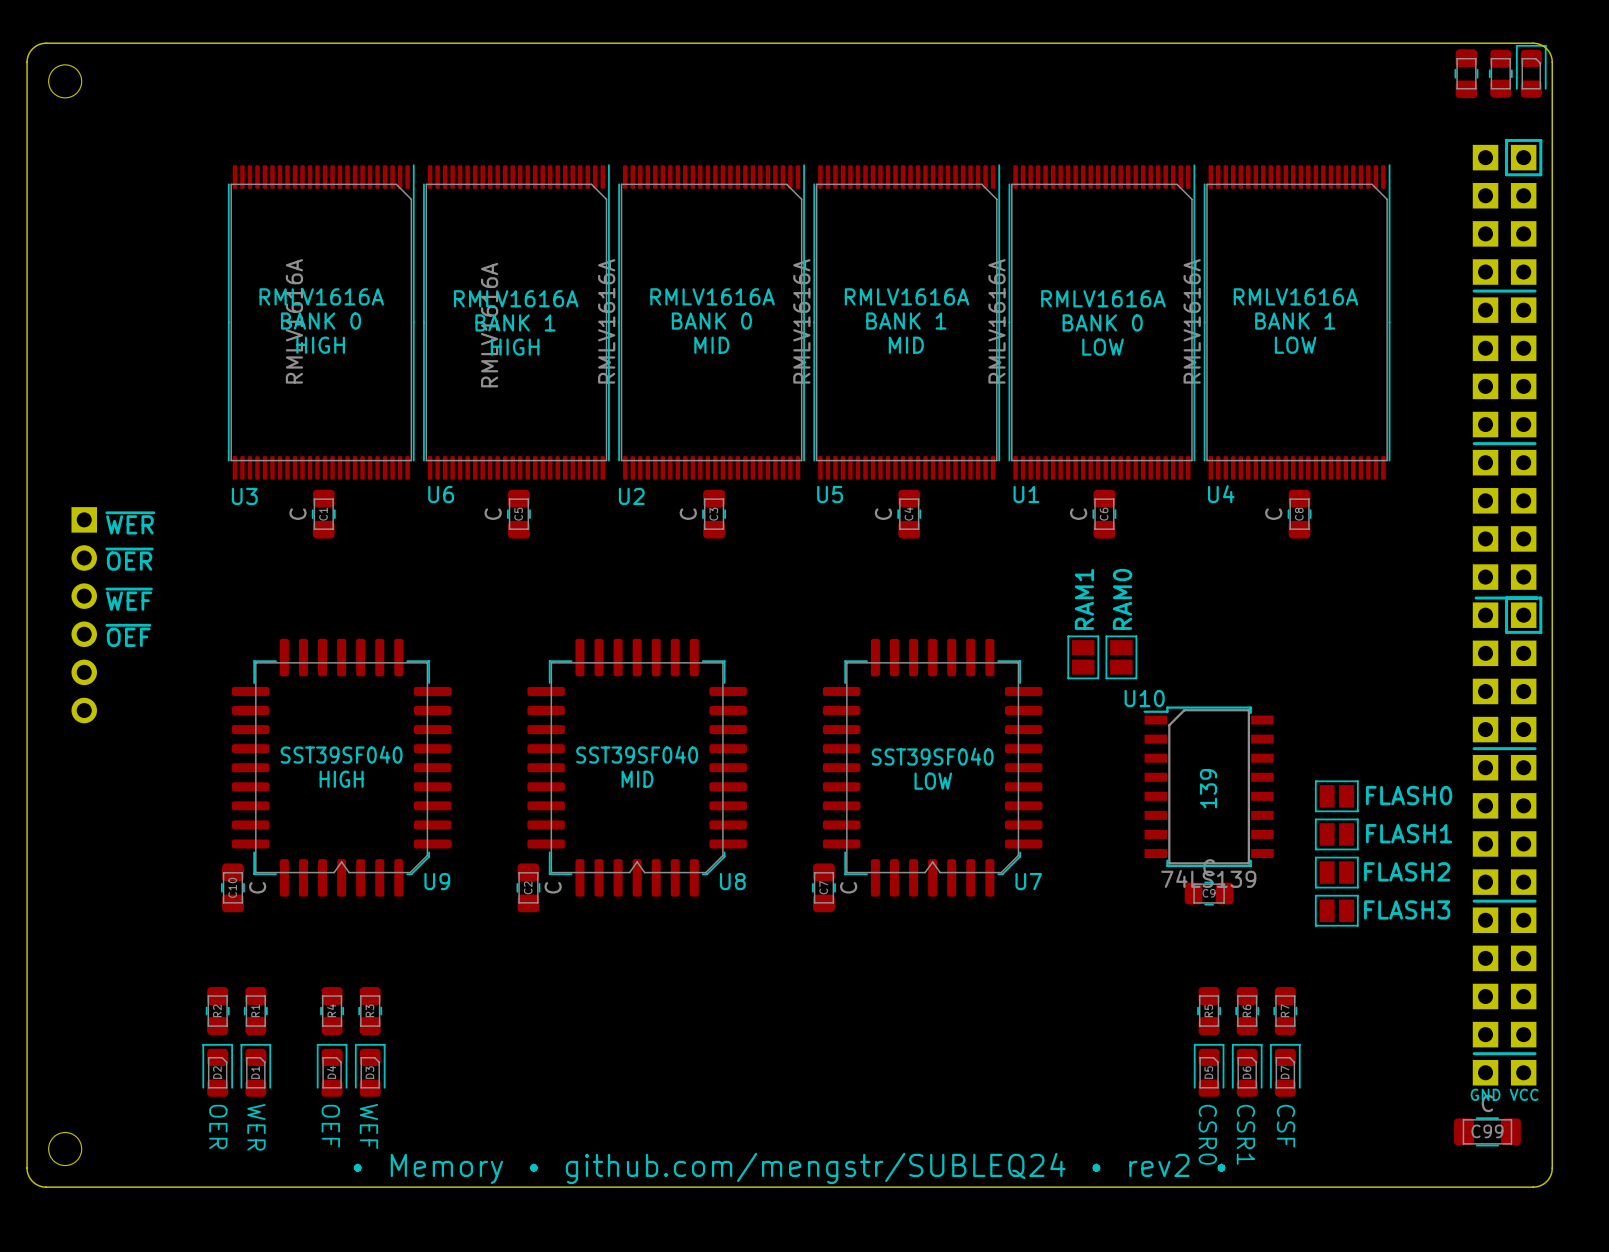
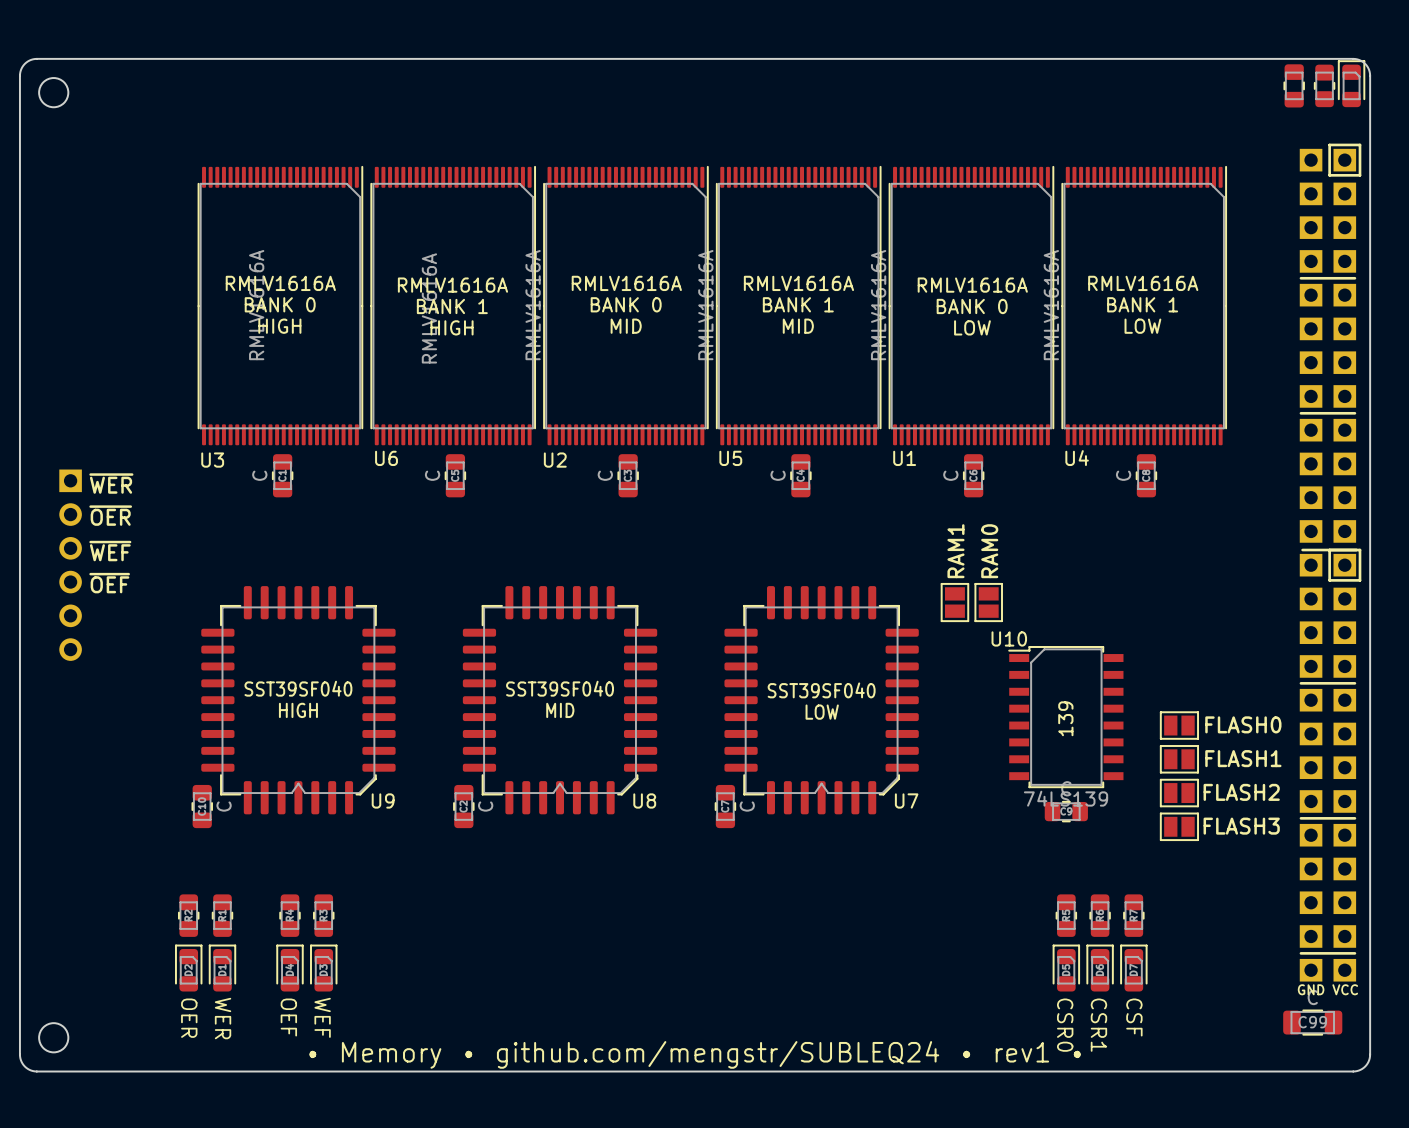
text: • Memory • github.com/mengstr/SUBLEQ24 • rev2 • (789, 1168) -> • Memory • github.com/mengstr/SUBLEQ24 • rev1 • (695, 1054)

